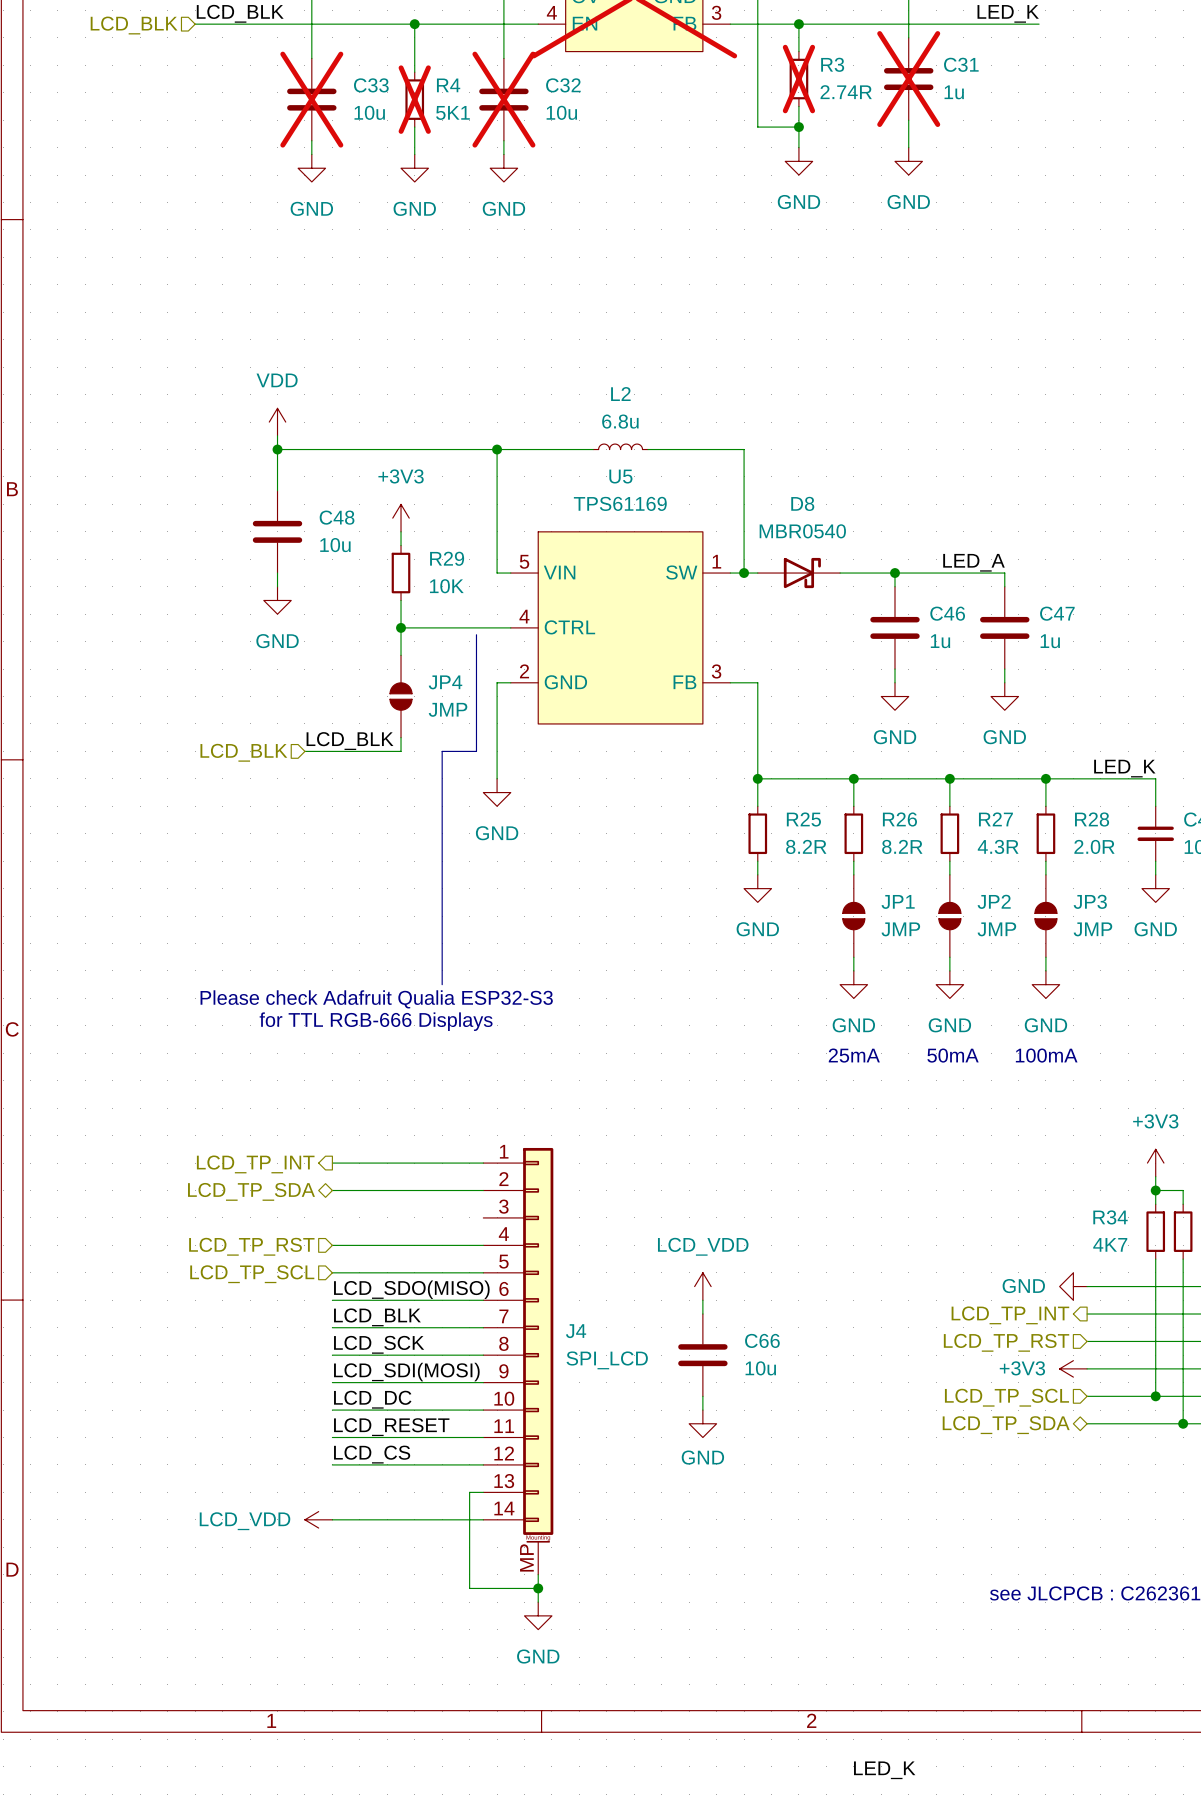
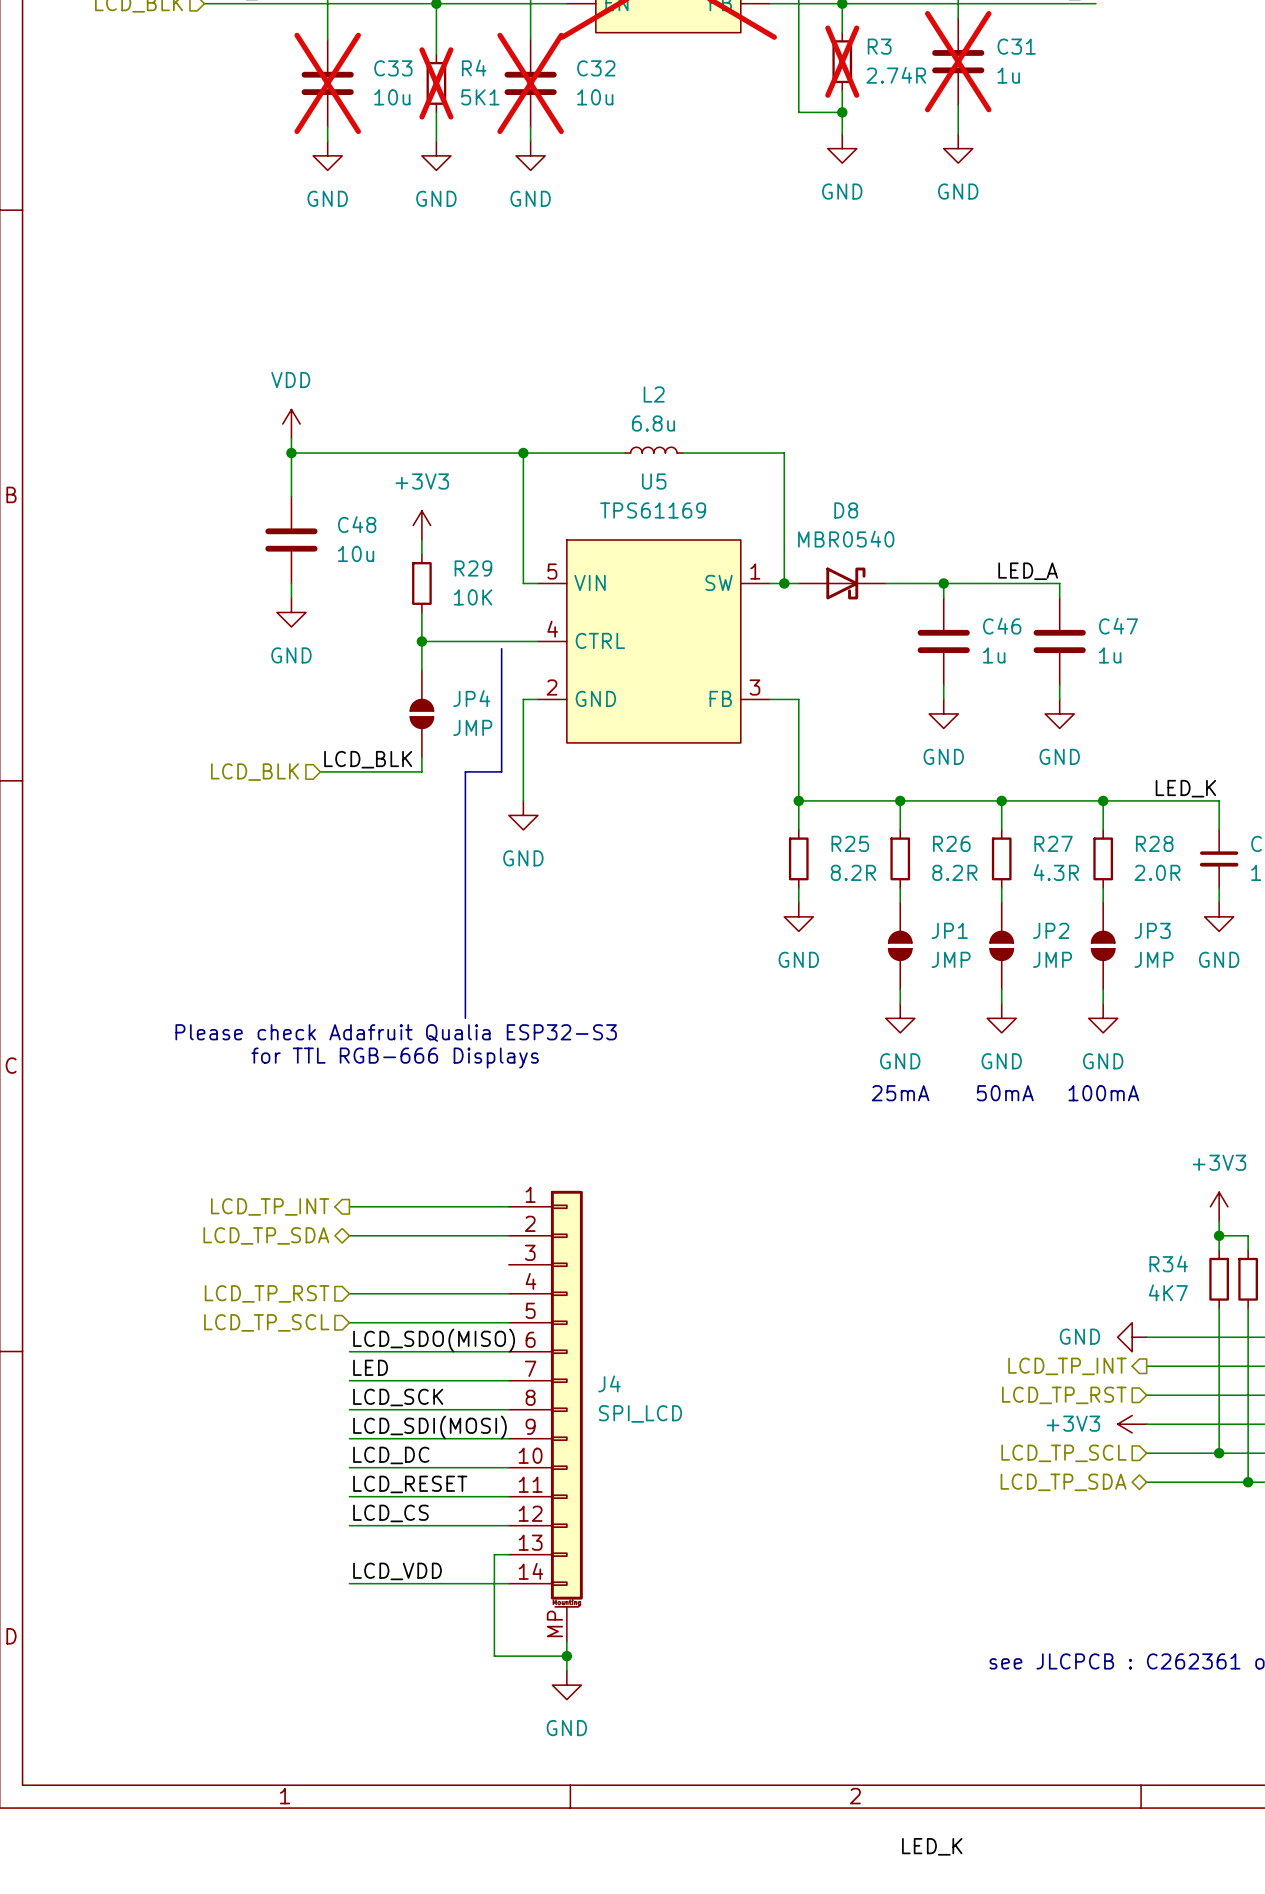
power symbol: LCD_VDD (702, 1286) -> none
wire: (702, 1300) (702, 1314) -> none
label: LCD_BLK (377, 1317) -> LED (370, 1367)
C66: 10u (702, 1355) -> none
wire: (702, 1396) (702, 1410) -> none
power symbol: GND (702, 1423) -> none
label: none -> LCD_VDD (397, 1571)
power symbol: LCD_VDD (318, 1519) -> none

